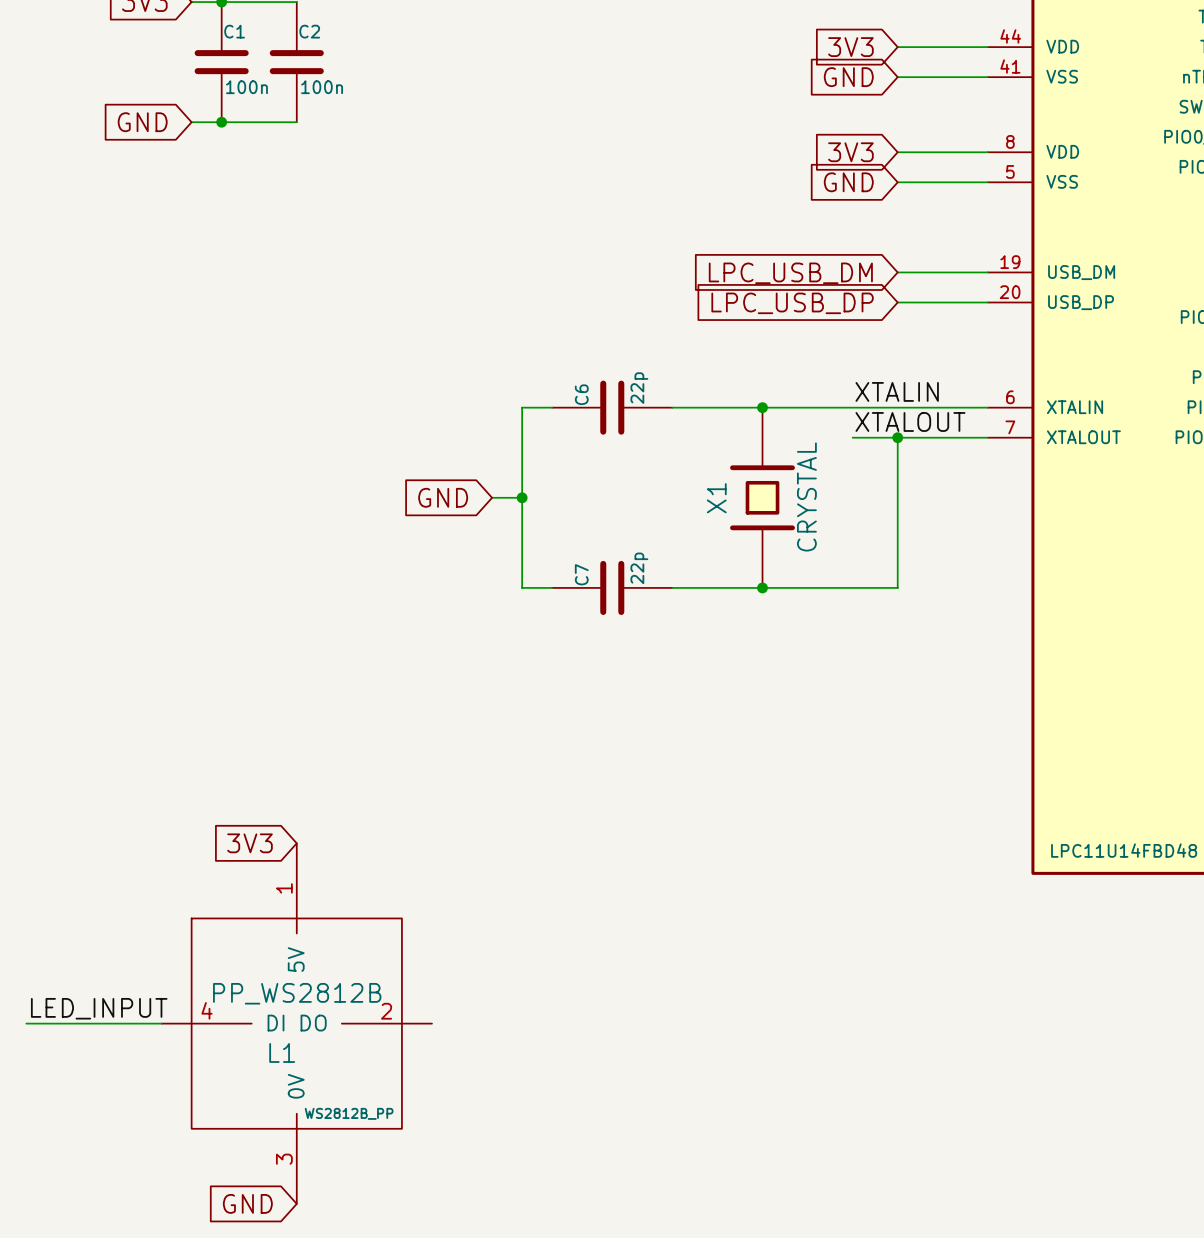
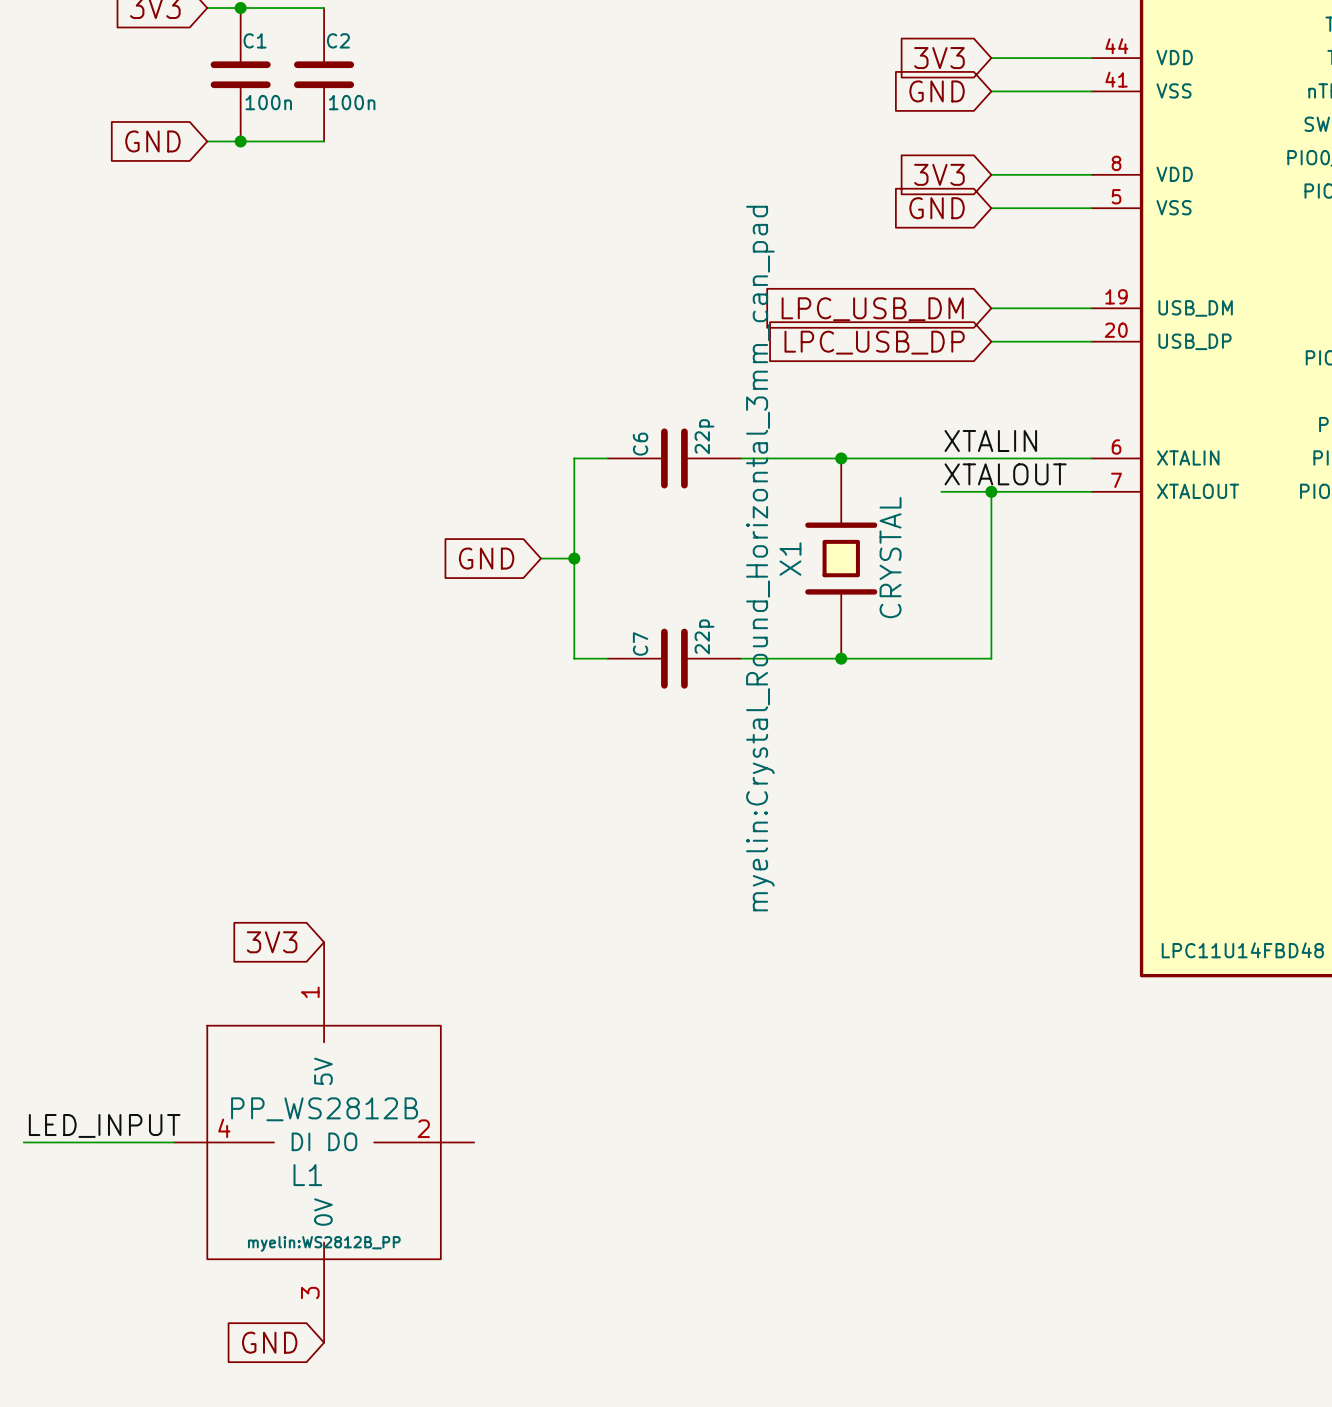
X1 text: none -> myelin:Crystal_Round_Horizontal_3mm_can_pad (760, 558)
L1 text: WS2812B_PP (349, 1113) -> myelin:WS2812B_PP (324, 1243)

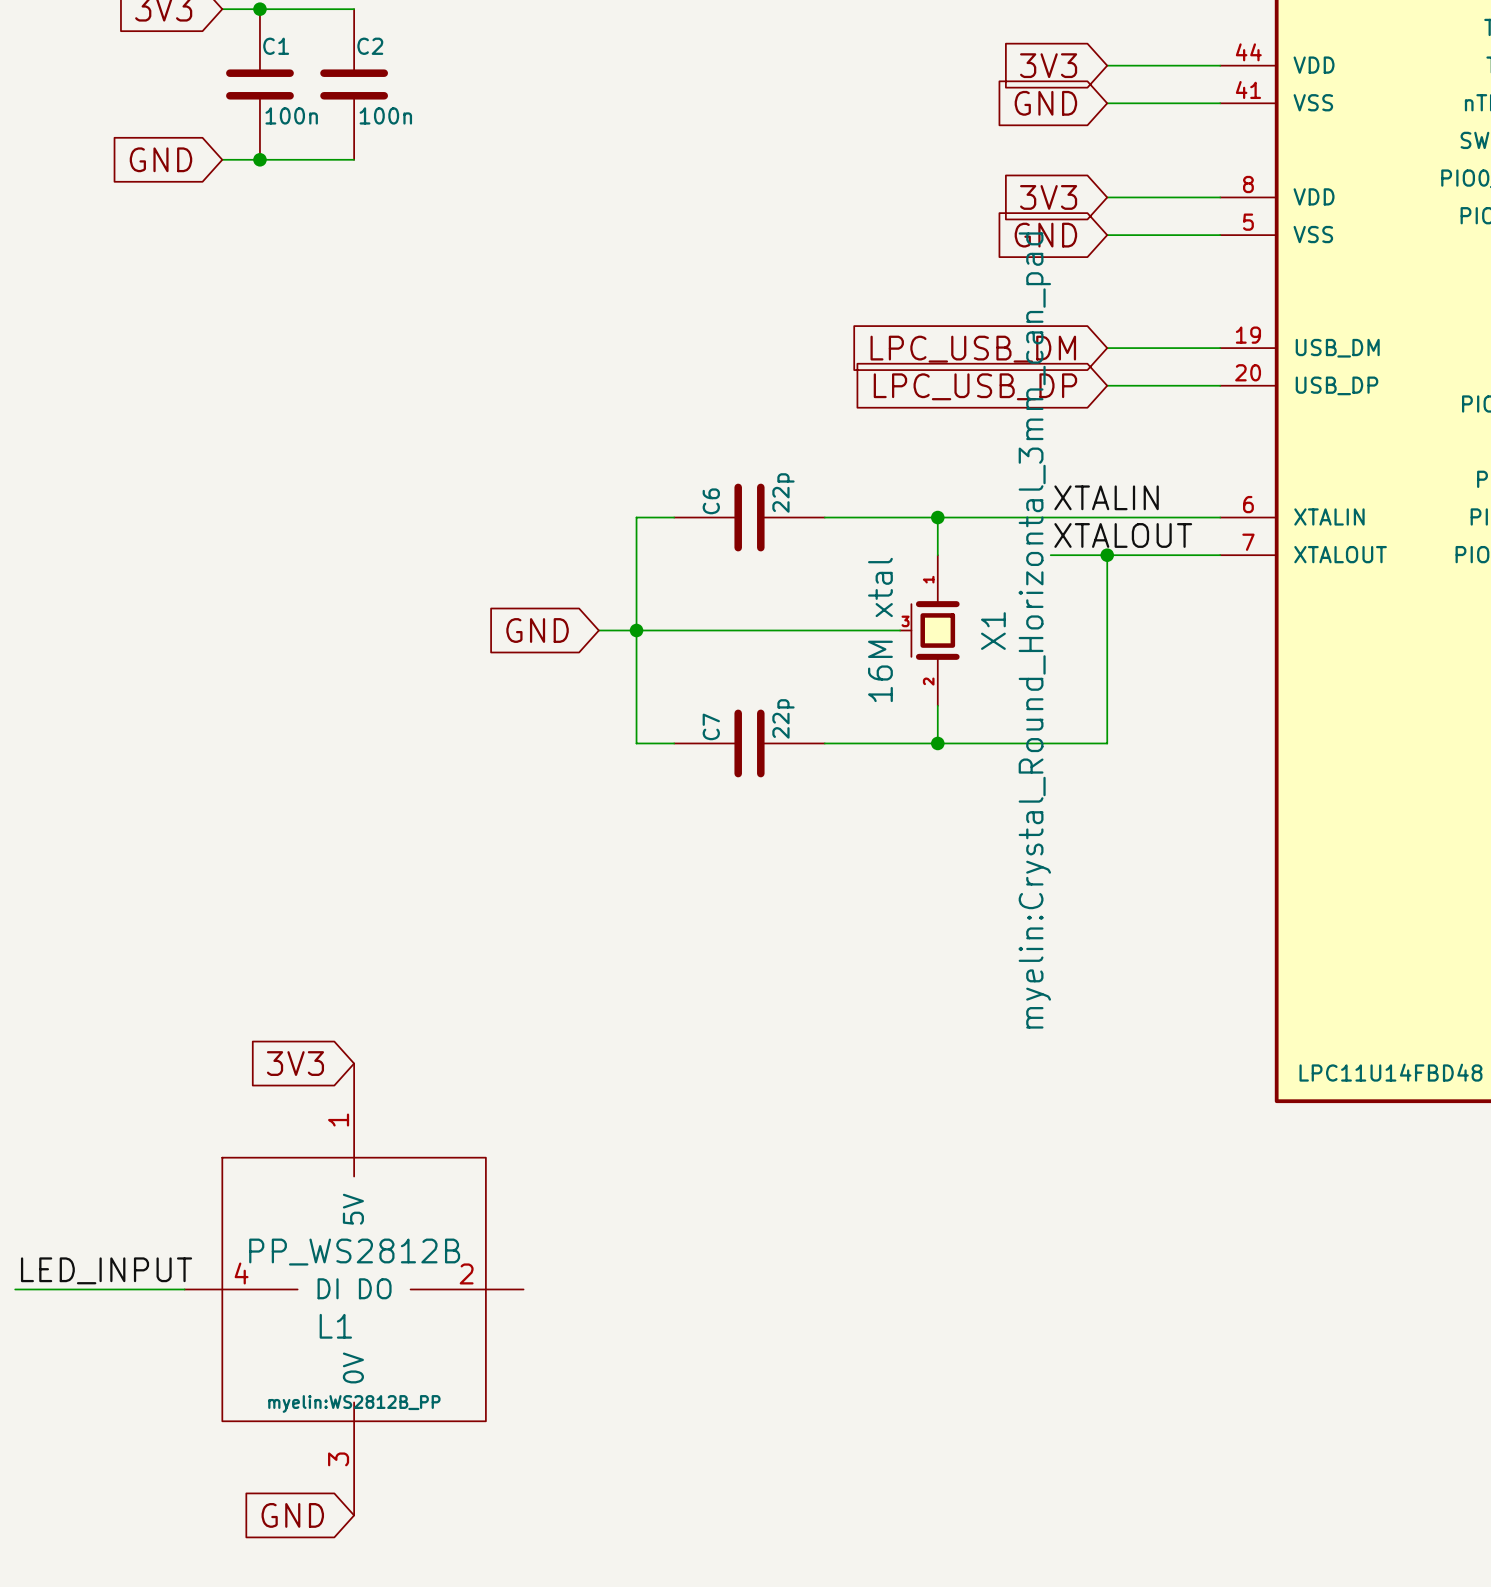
X1 symbol: [805, 458, 878, 659] -> [900, 555, 960, 706]
X1 value: CRYSTAL (890, 557) -> 16M xtal (880, 629)
wire: none -> (636, 630) (900, 630)
X1 text position: myelin:Crystal_Round_Horizontal_3mm_can_pad (760, 558) -> myelin:Crystal_Round_Horizontal_3mm_can_pad (1034, 630)
X1 name position: X1 (790, 559) -> X1 (993, 631)

